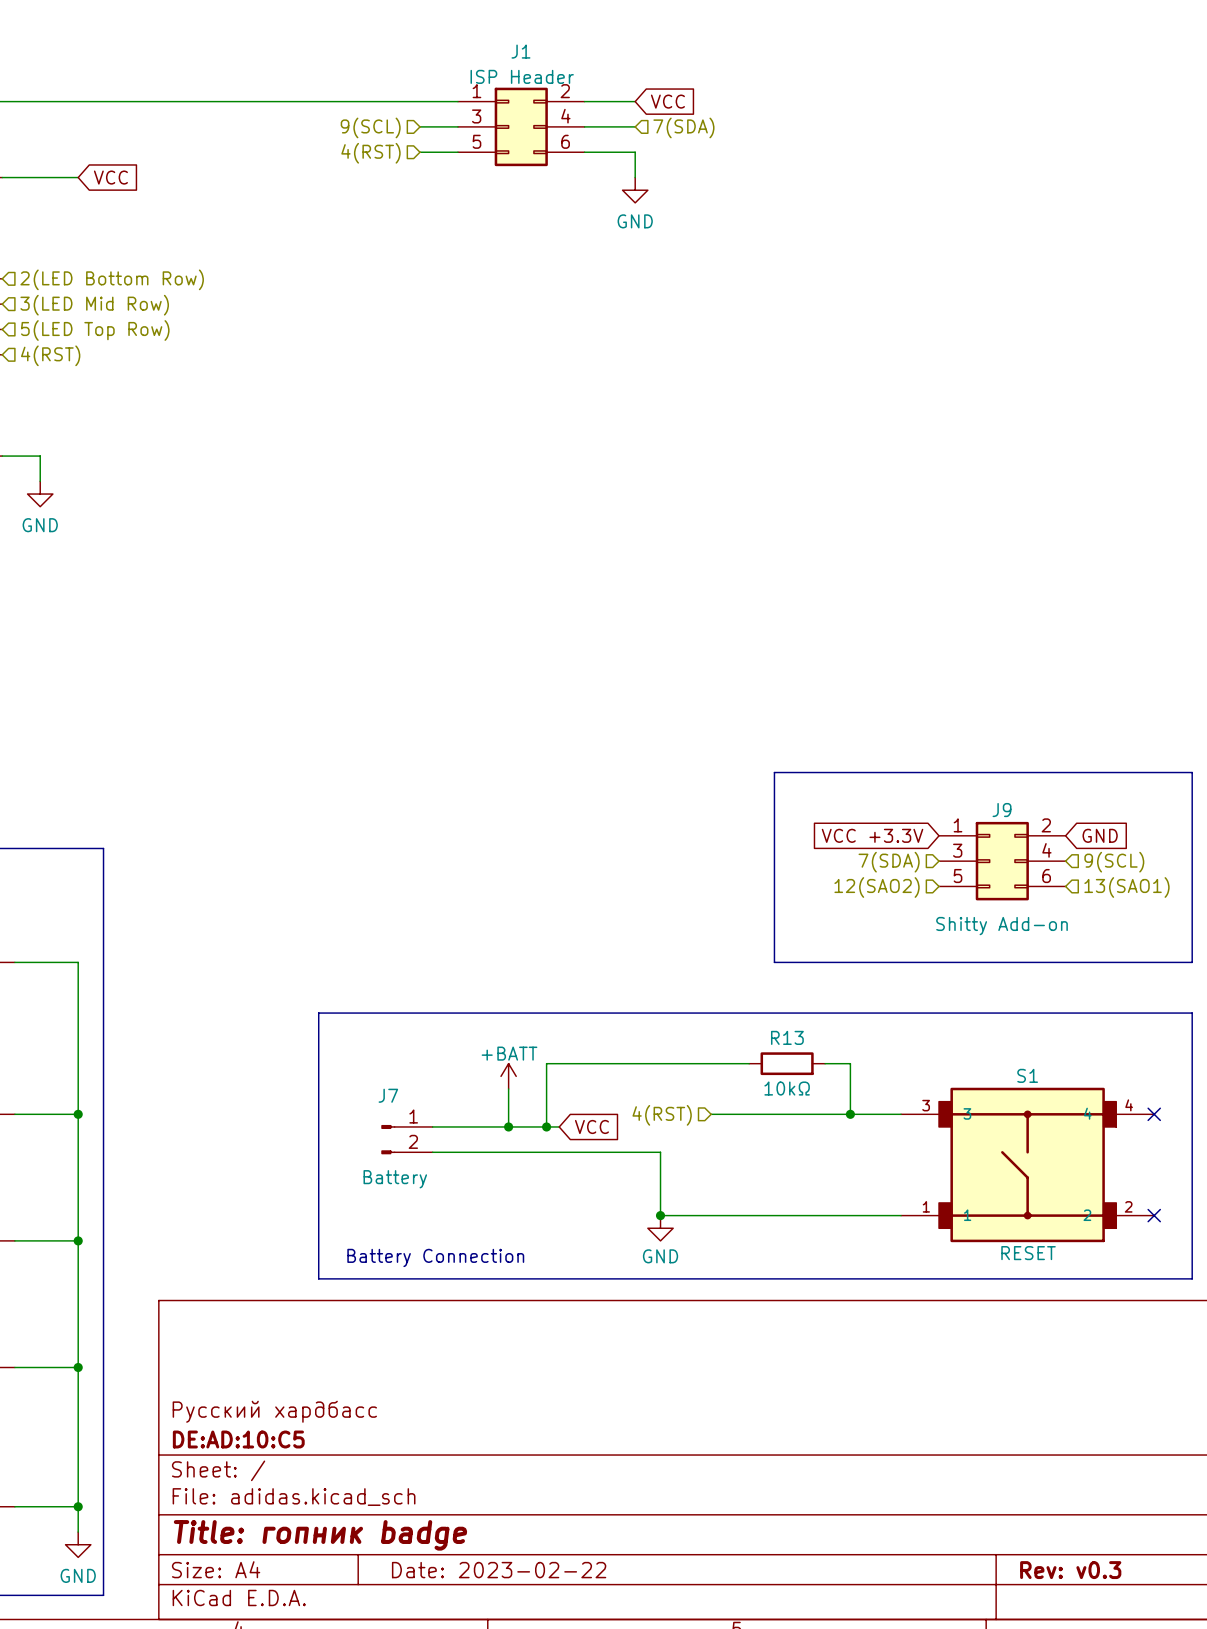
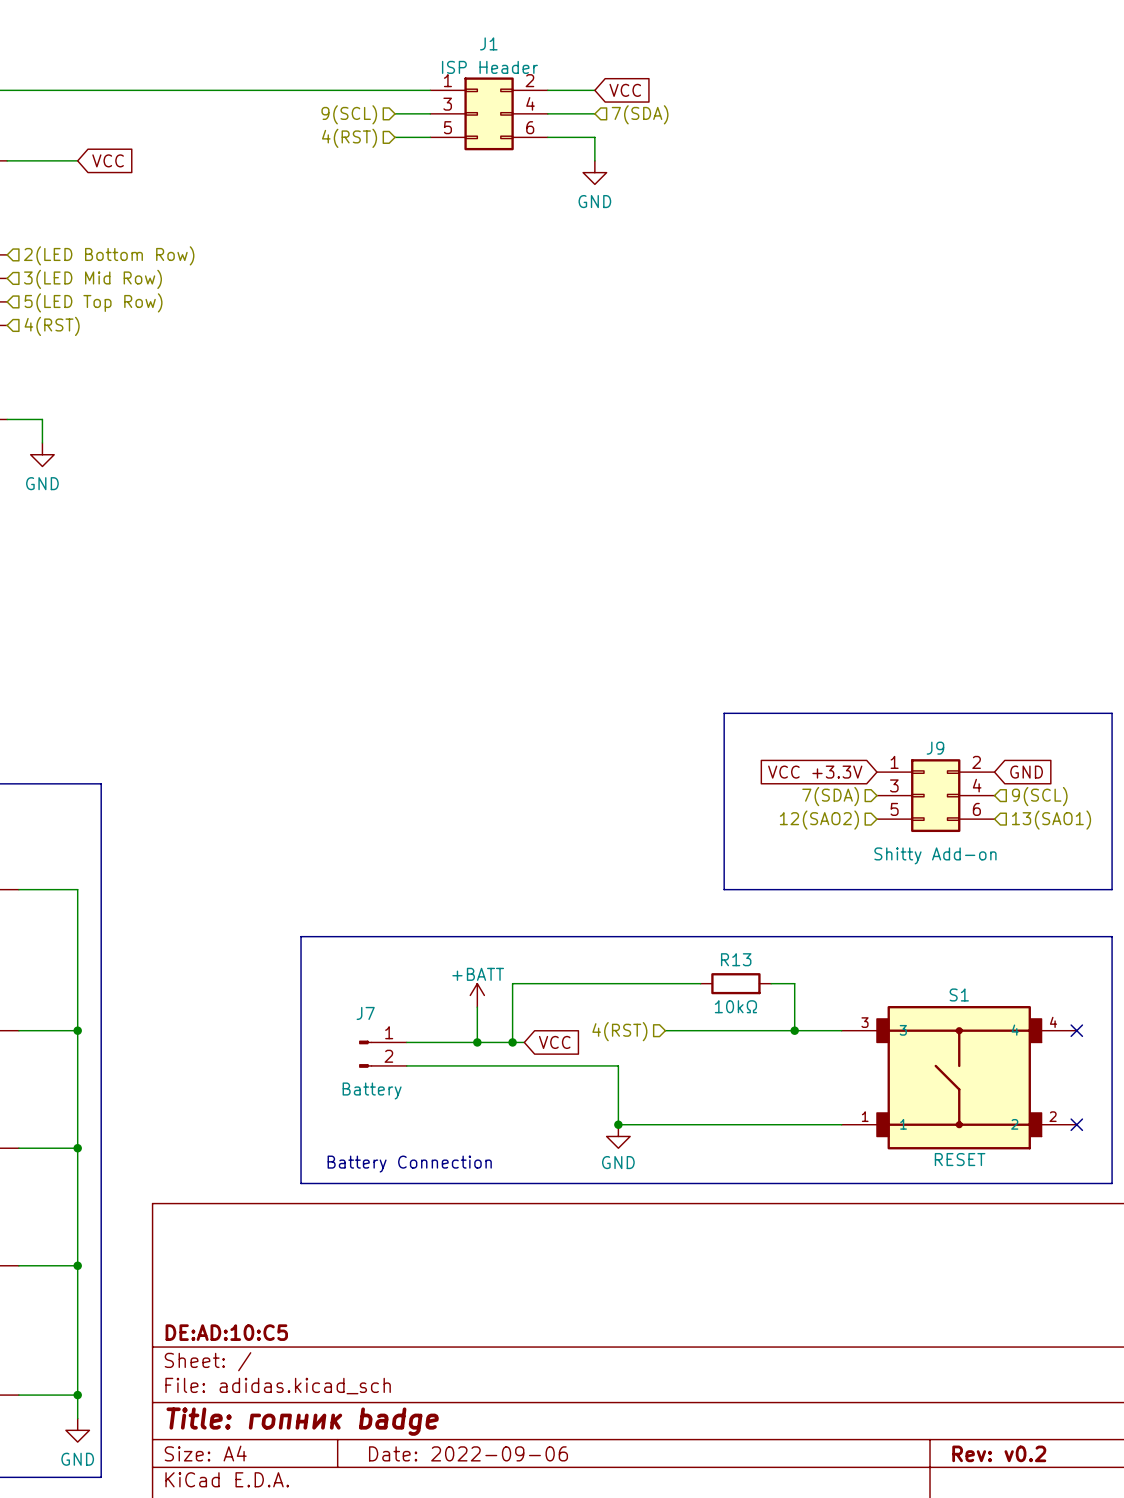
title block: Русский хардбасс (274, 1411) -> none
title block: Date: 2023-02-22 (499, 1570) -> Date: 2022-09-06 (468, 1453)
title block: Rev: v0.3 (1070, 1570) -> Rev: v0.2 (999, 1453)

